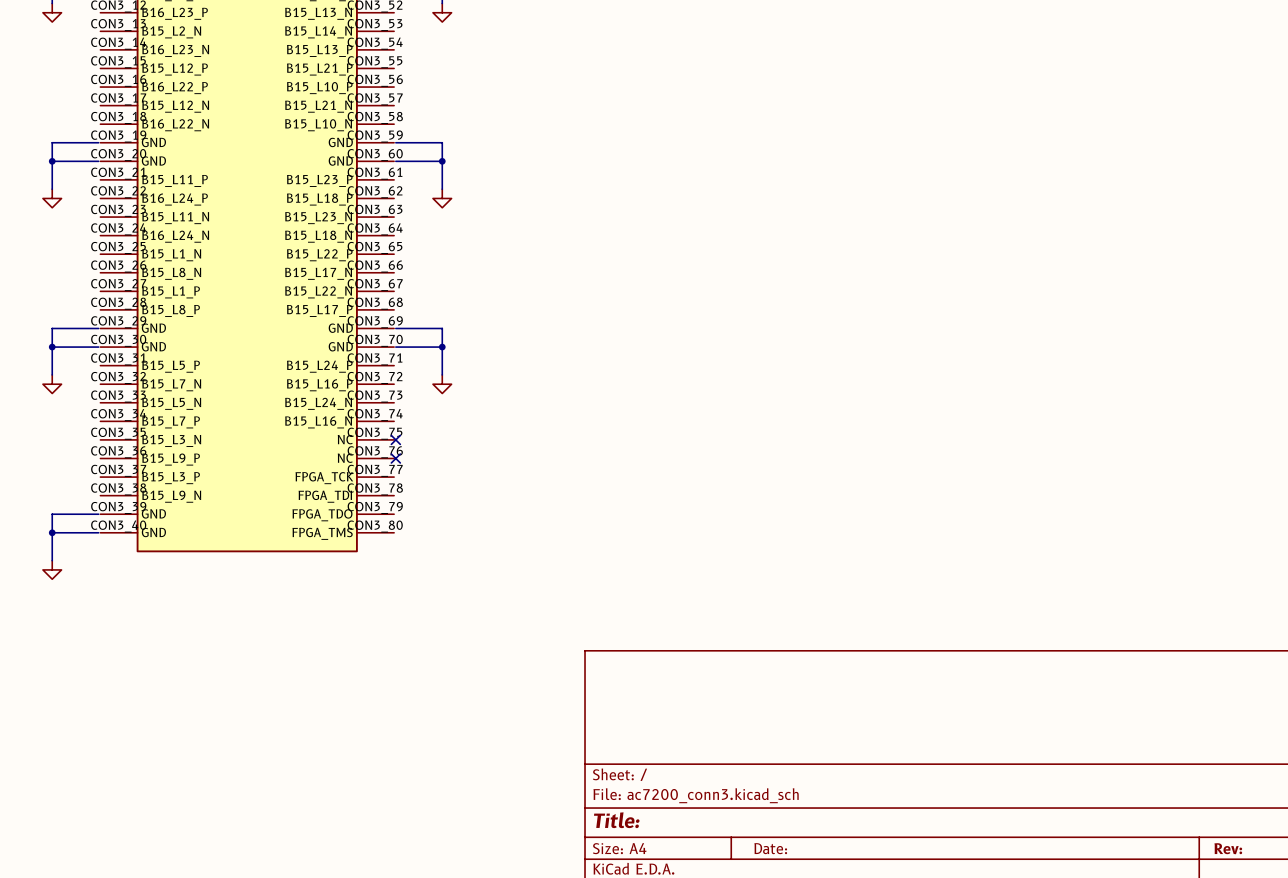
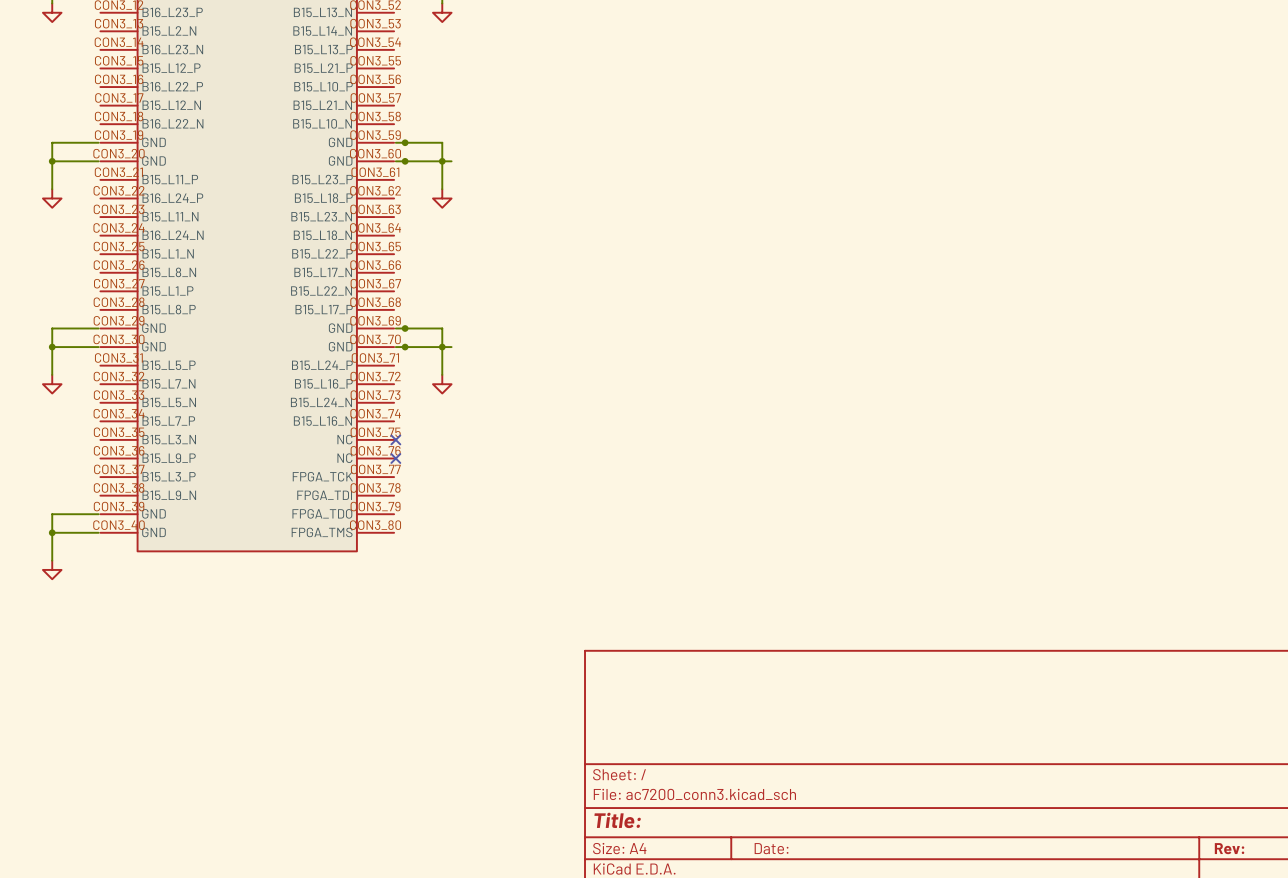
junction: none -> (405, 142)
junction: none -> (405, 161)
wire: none -> (442, 161) (451, 161)
junction: none -> (405, 328)
junction: none -> (405, 347)
wire: none -> (442, 347) (451, 347)

